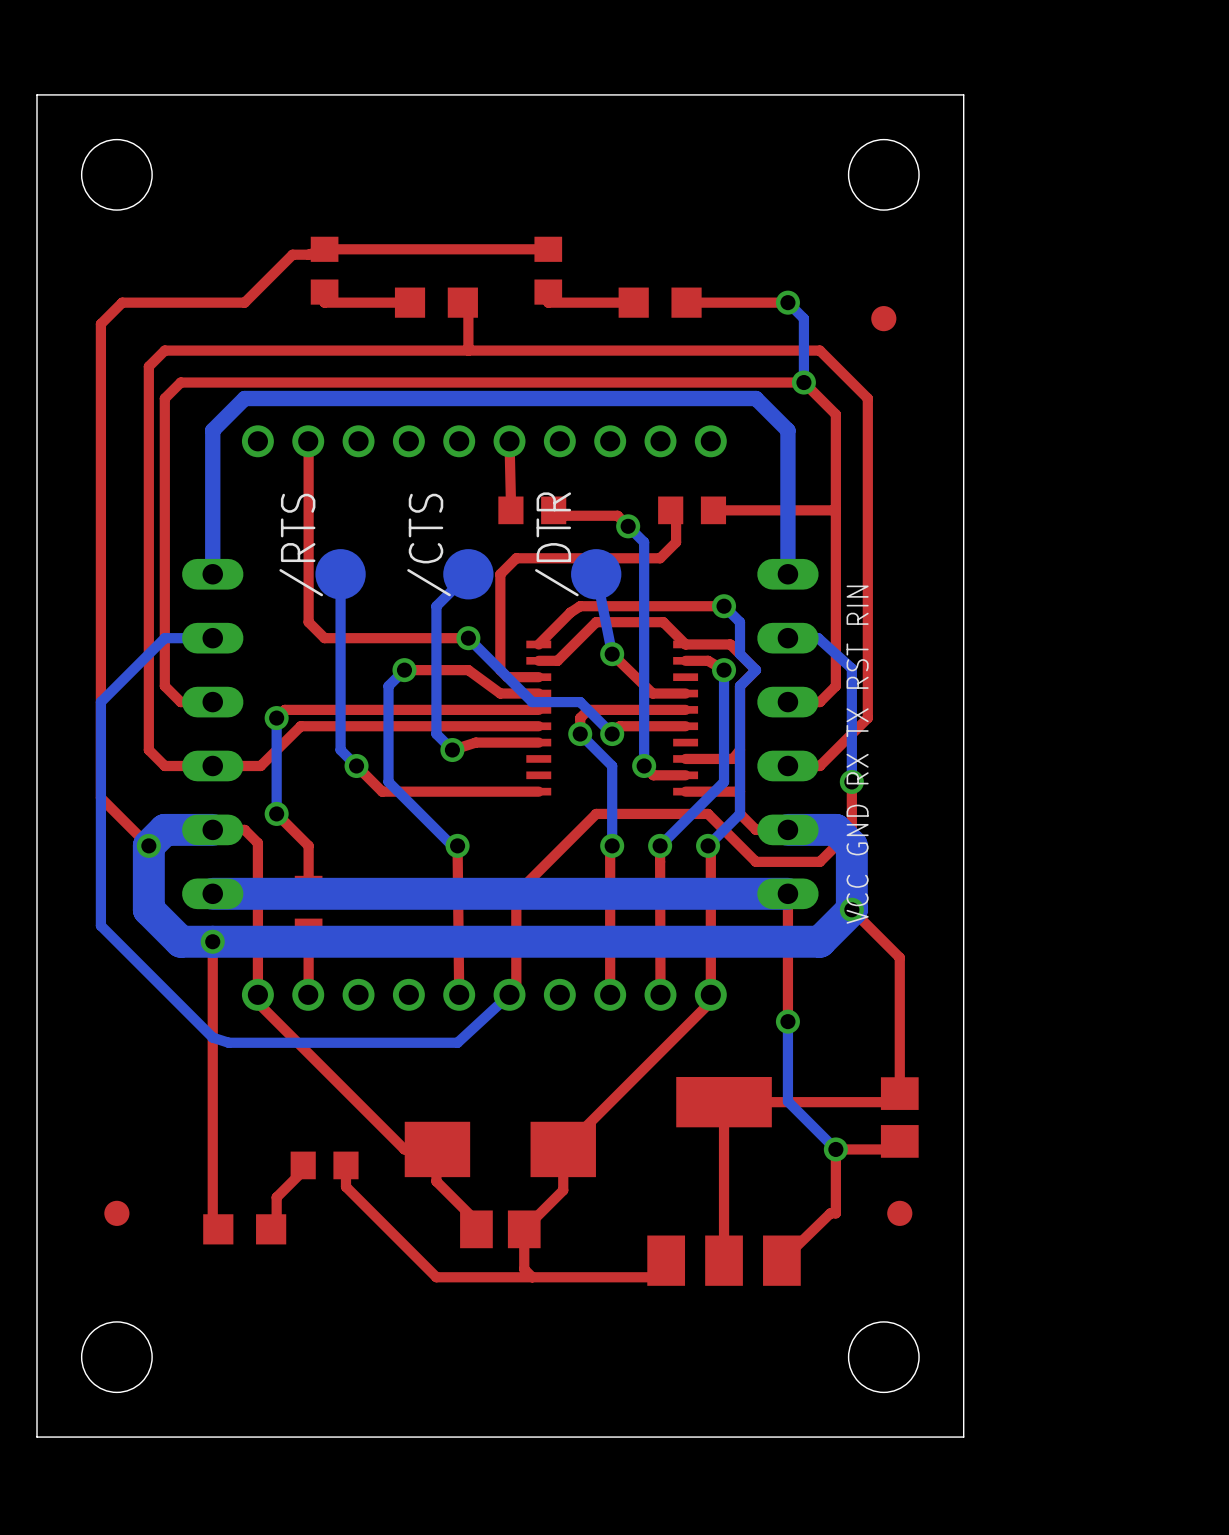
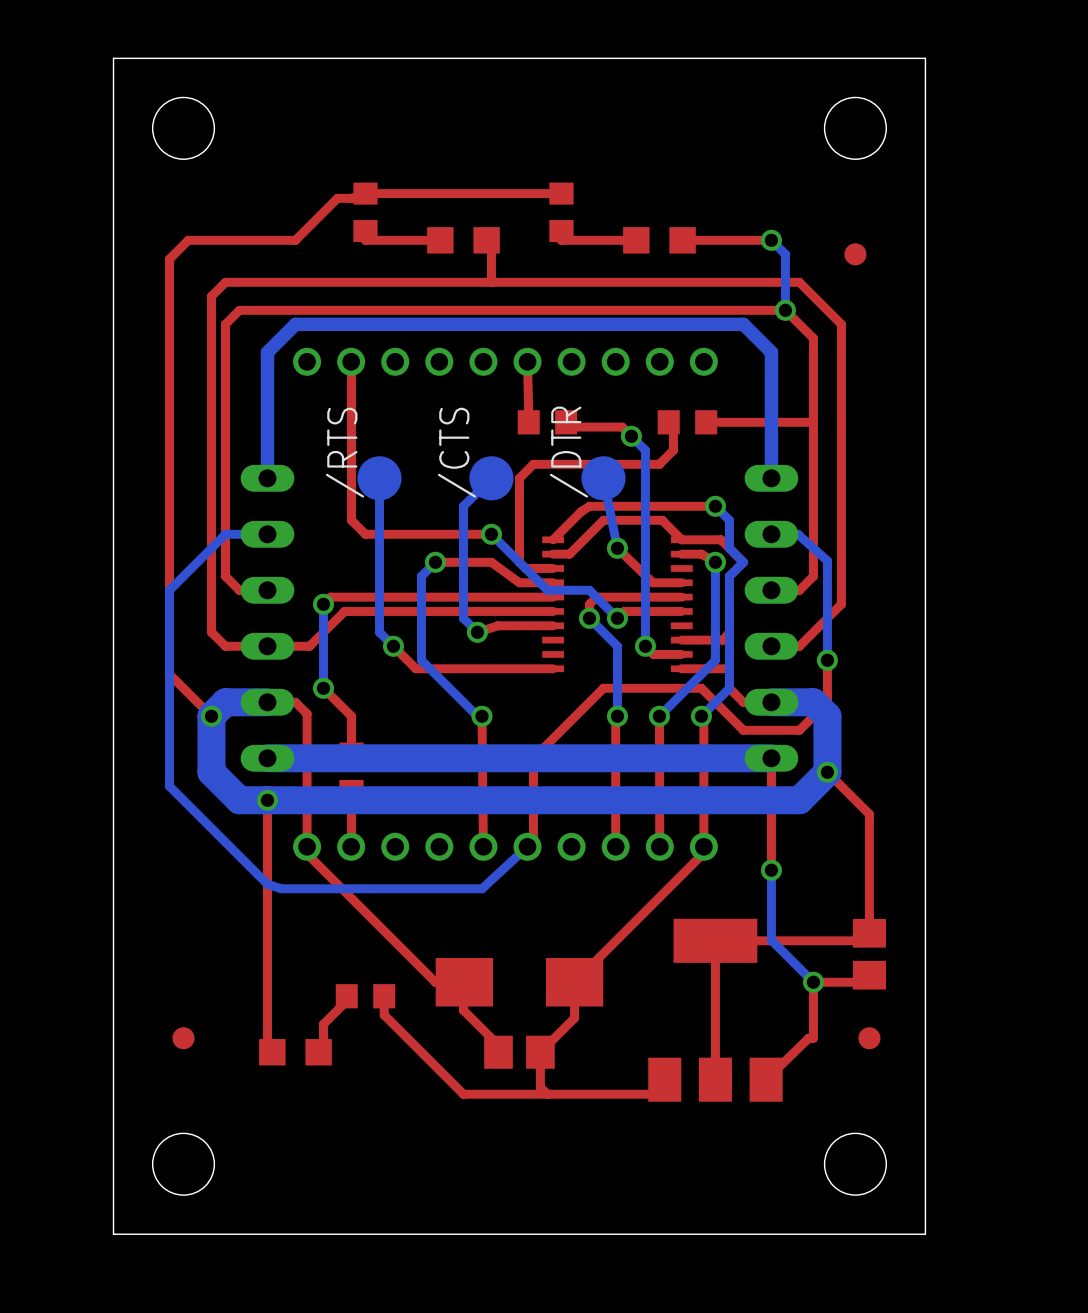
text: VCC GND RX TX RST RIN (857, 754) -> none

